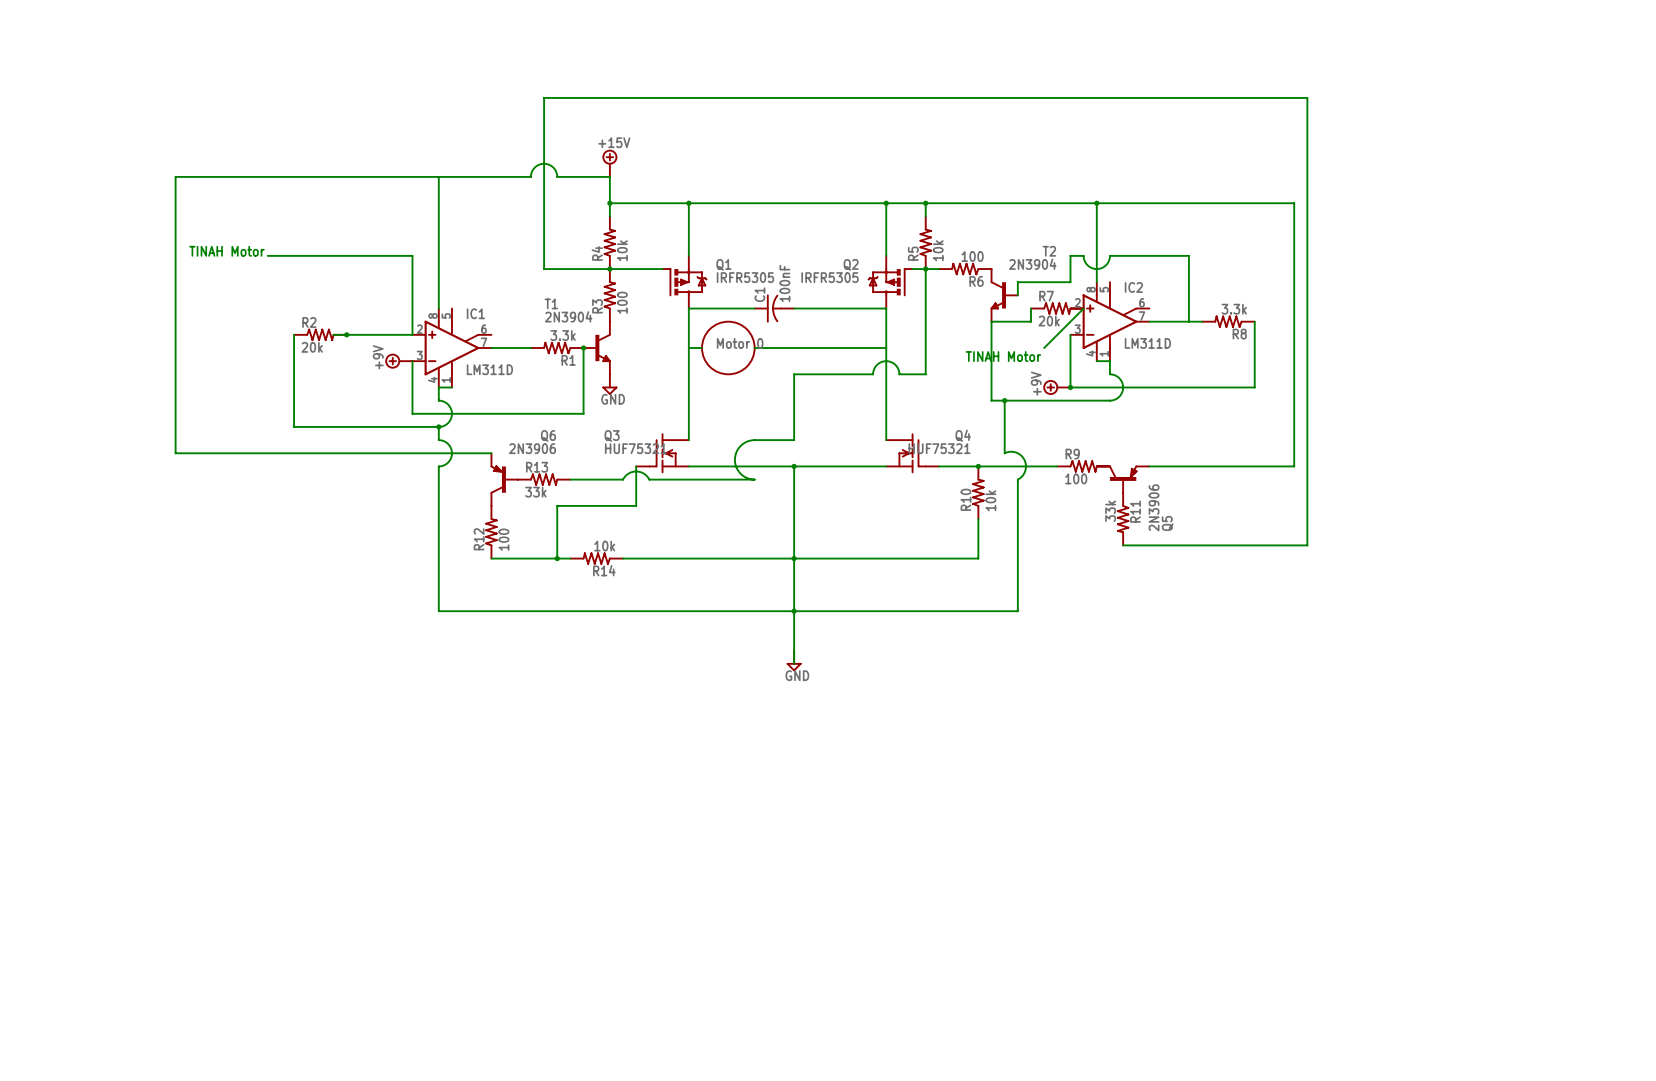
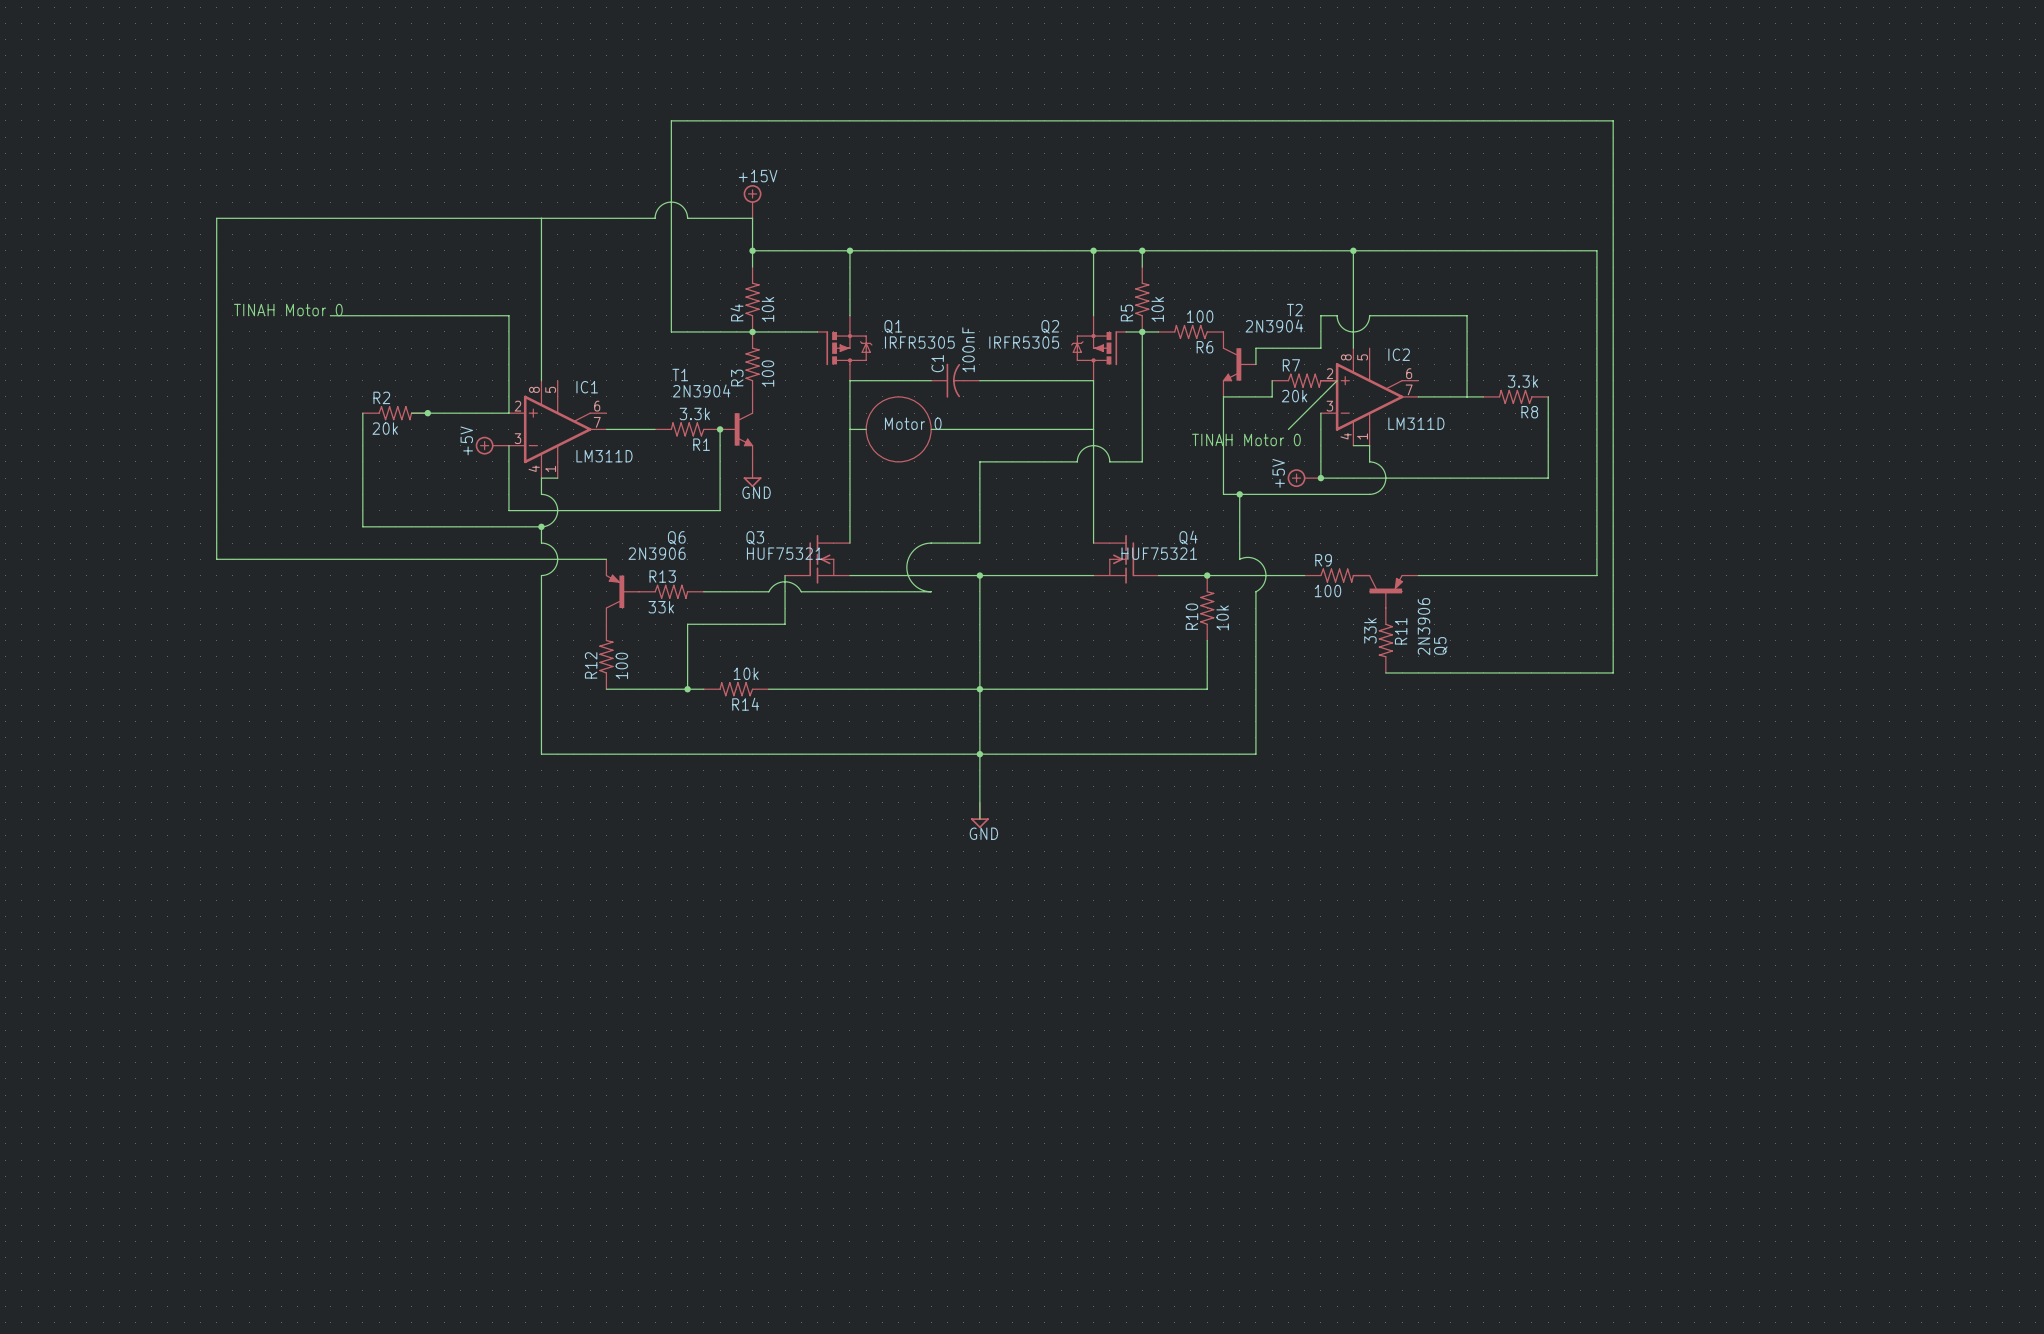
text: TINAH Motor (226, 251) -> TINAH Motor 0 (288, 310)
text: TINAH Motor (1003, 356) -> TINAH Motor 0 (1246, 439)
power symbol: +9V (399, 361) -> +5V (492, 445)
power symbol: +9V (1056, 387) -> +5V (1304, 478)

